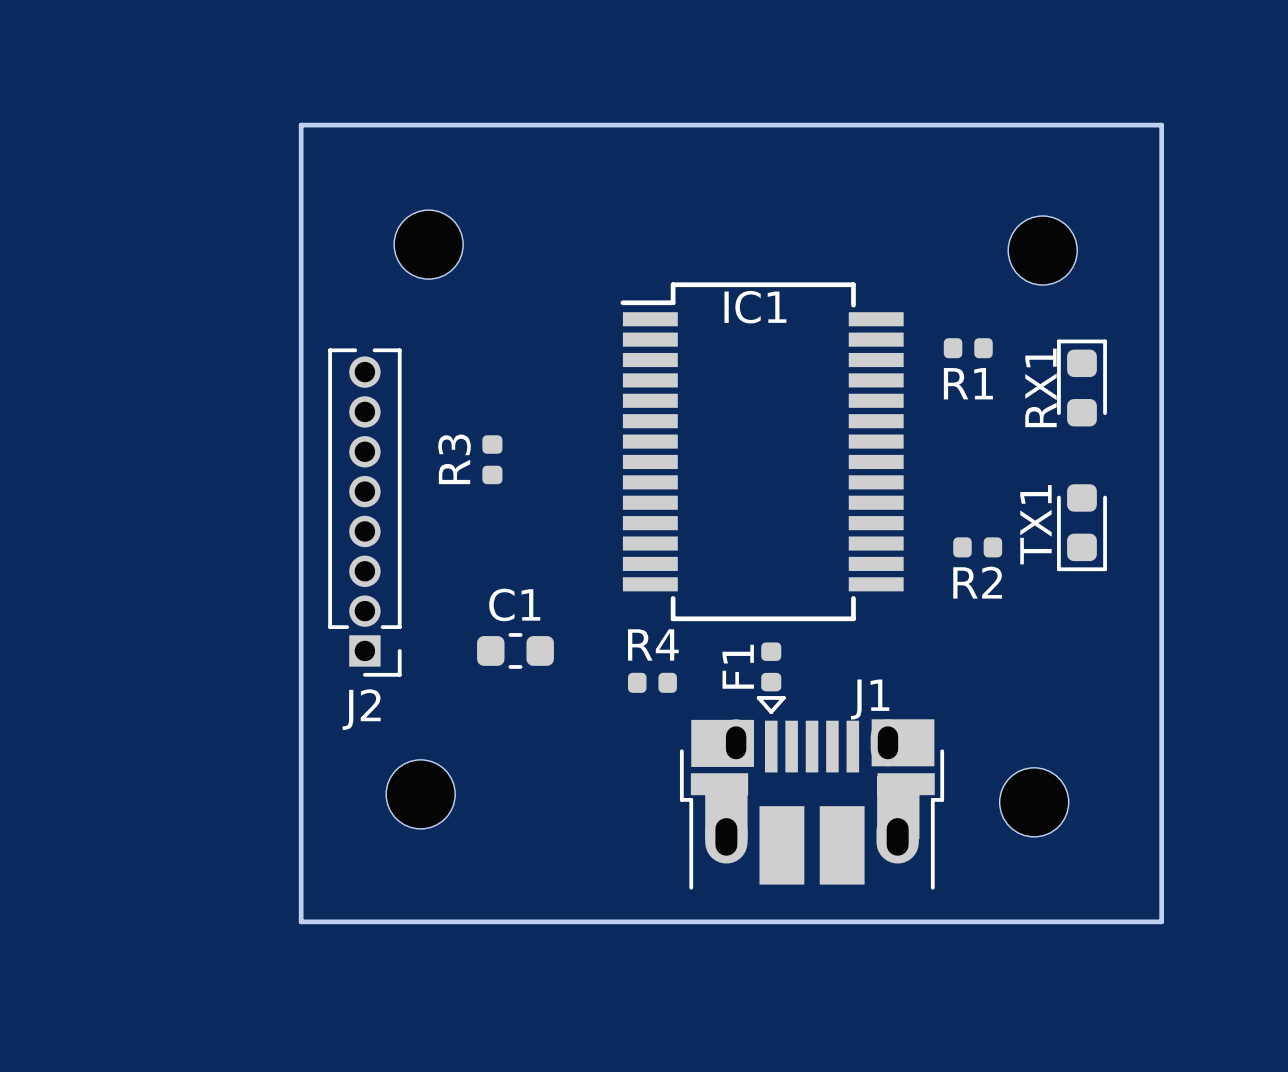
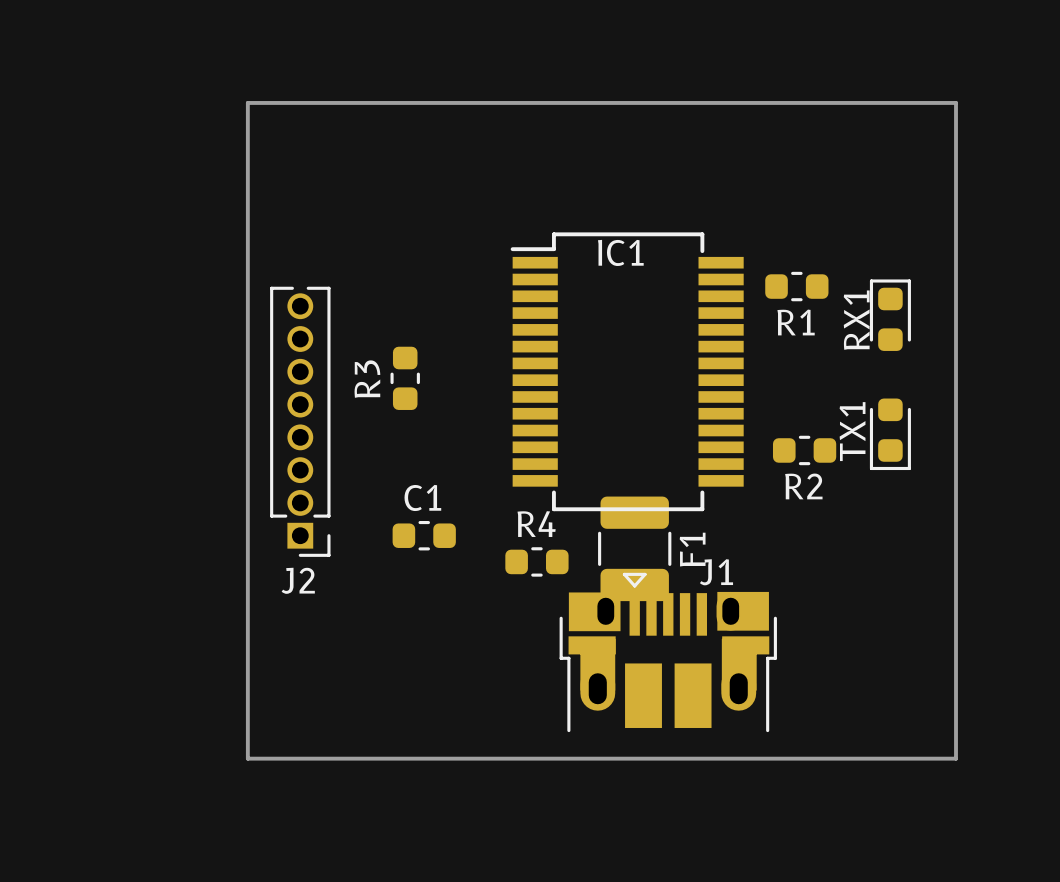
part: (428, 244) -> none
part: (1042, 250) -> none
R1 footprint: [943, 338, 993, 359] -> [765, 271, 829, 302]
R3 footprint: [482, 435, 503, 485] -> [390, 346, 420, 410]
R2 footprint: [953, 537, 1003, 558] -> [772, 435, 837, 466]
F1 footprint: [761, 642, 782, 692] -> [598, 496, 672, 602]
F1 name position: F1 (738, 666) -> F1 (692, 549)
R4 footprint: [627, 672, 677, 693] -> [505, 547, 569, 577]
part: (420, 794) -> none
part: (1034, 802) -> none

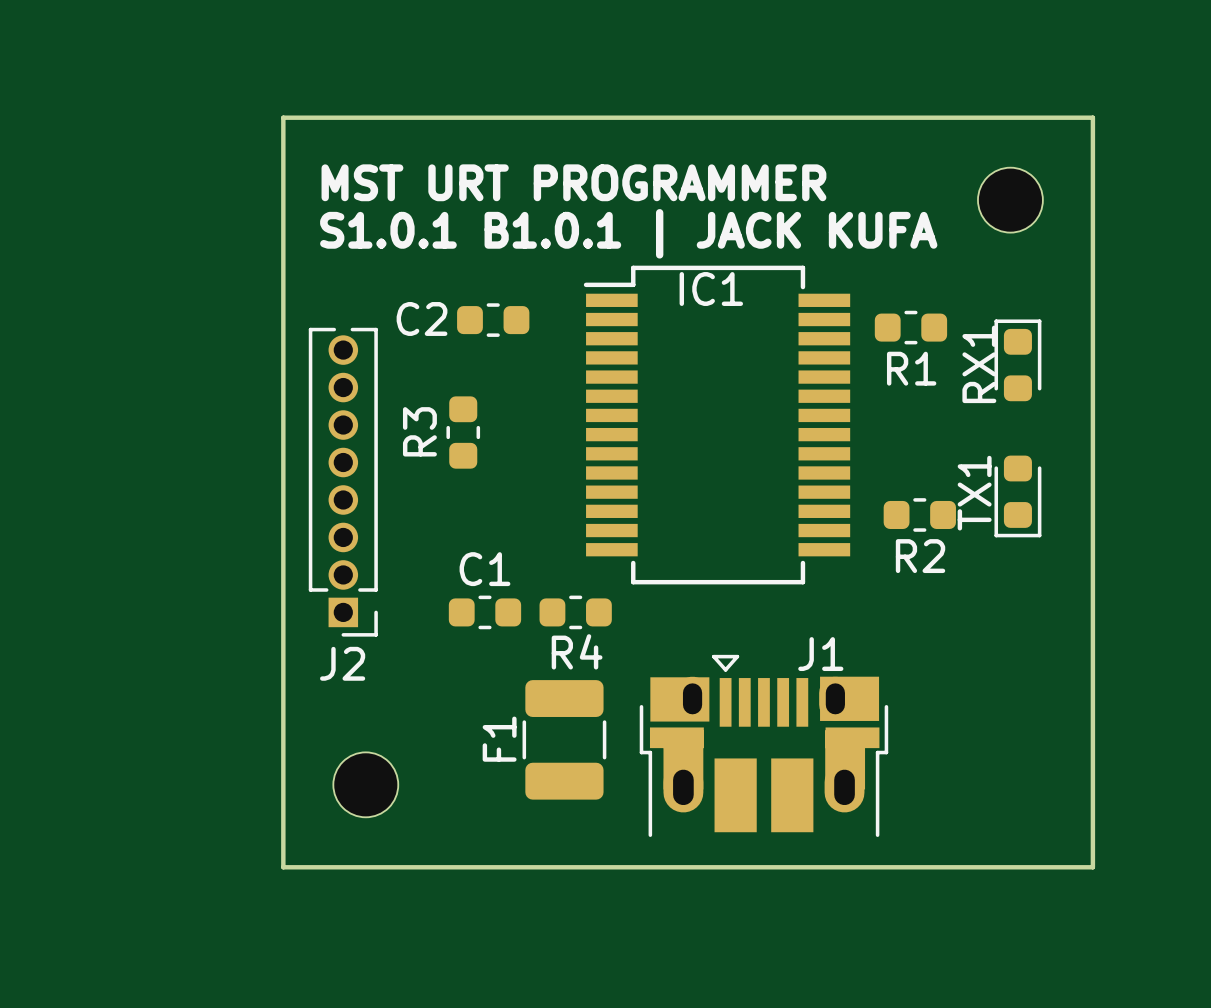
text: none -> MST URT PROGRAMMER (573, 182)
part: none -> (1010, 200)
text: none -> S1.0.1 B1.0.1 | JACK KUFA (628, 233)
C2: none -> (493, 320)
R4 name position: R4 (536, 524) -> R4 (577, 651)
F1 position: (634, 548) -> (564, 739)
F1 name position: F1 (692, 549) -> F1 (499, 739)
R4 position: (536, 561) -> (575, 612)
part: none -> (365, 784)

